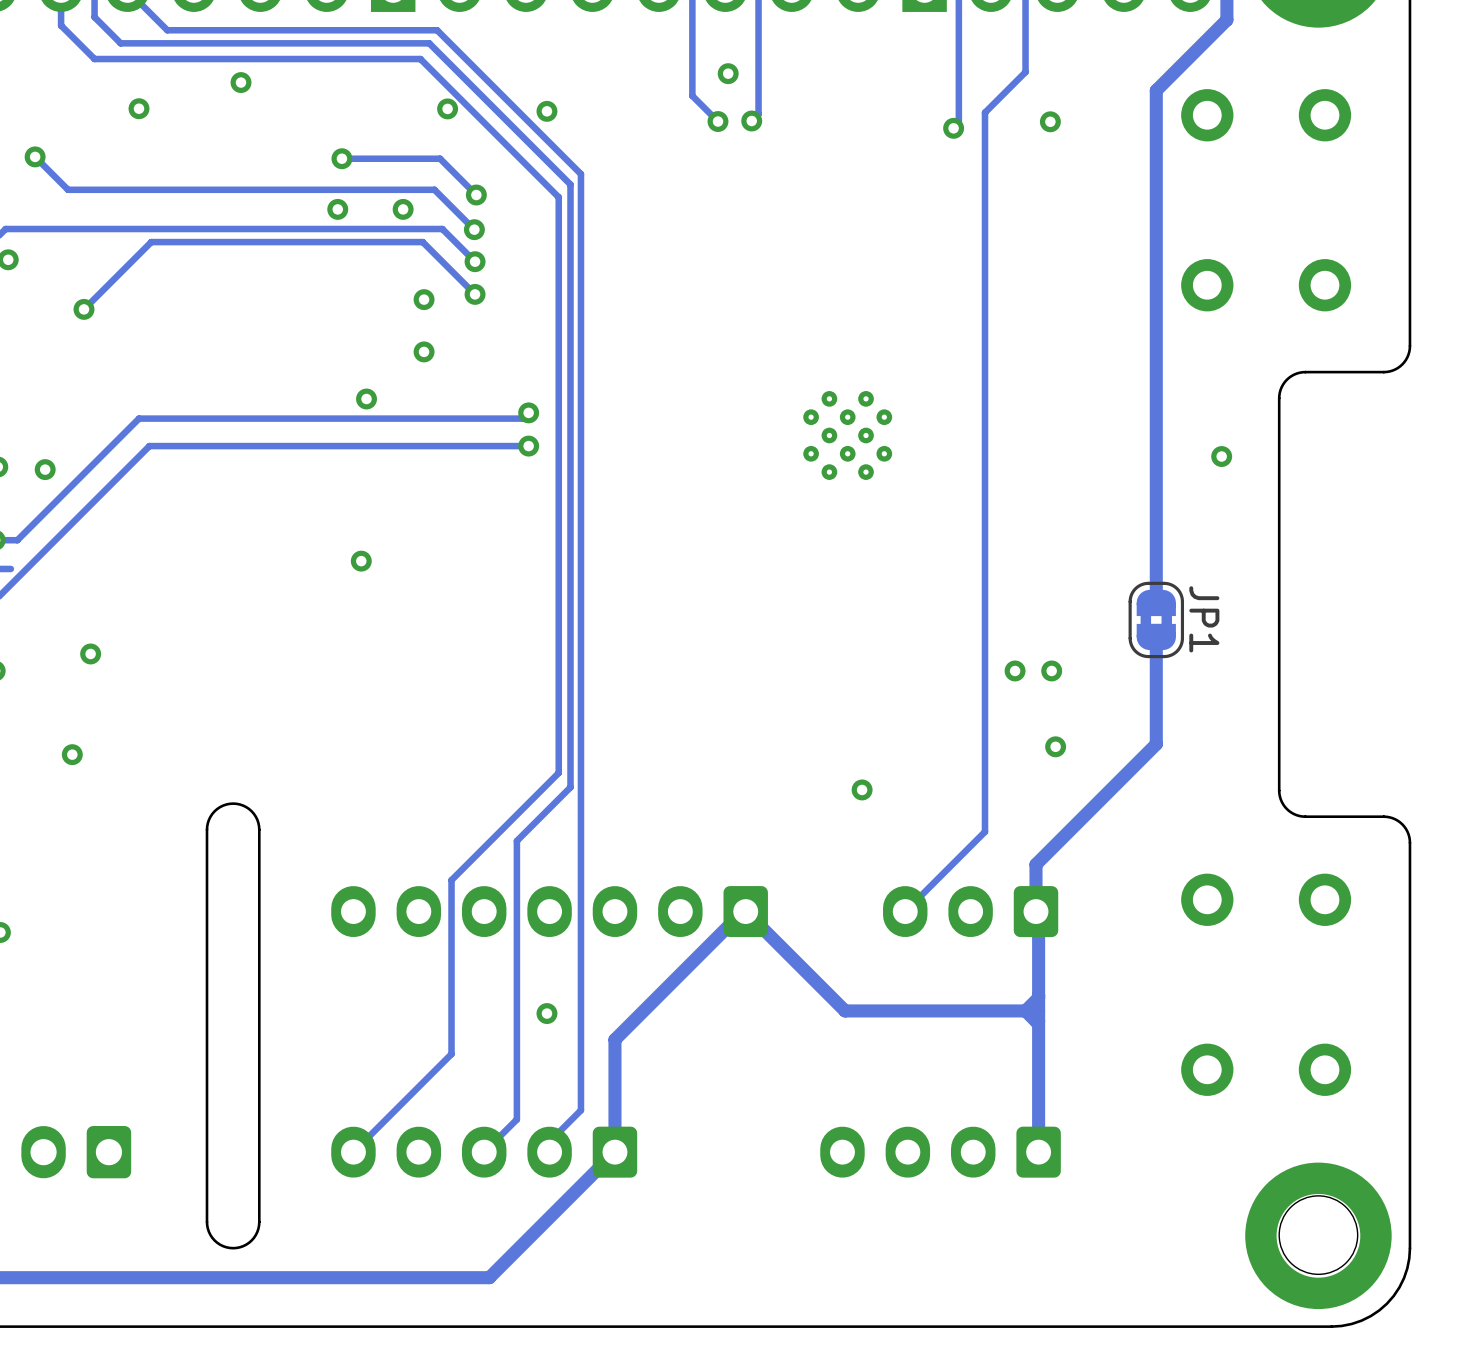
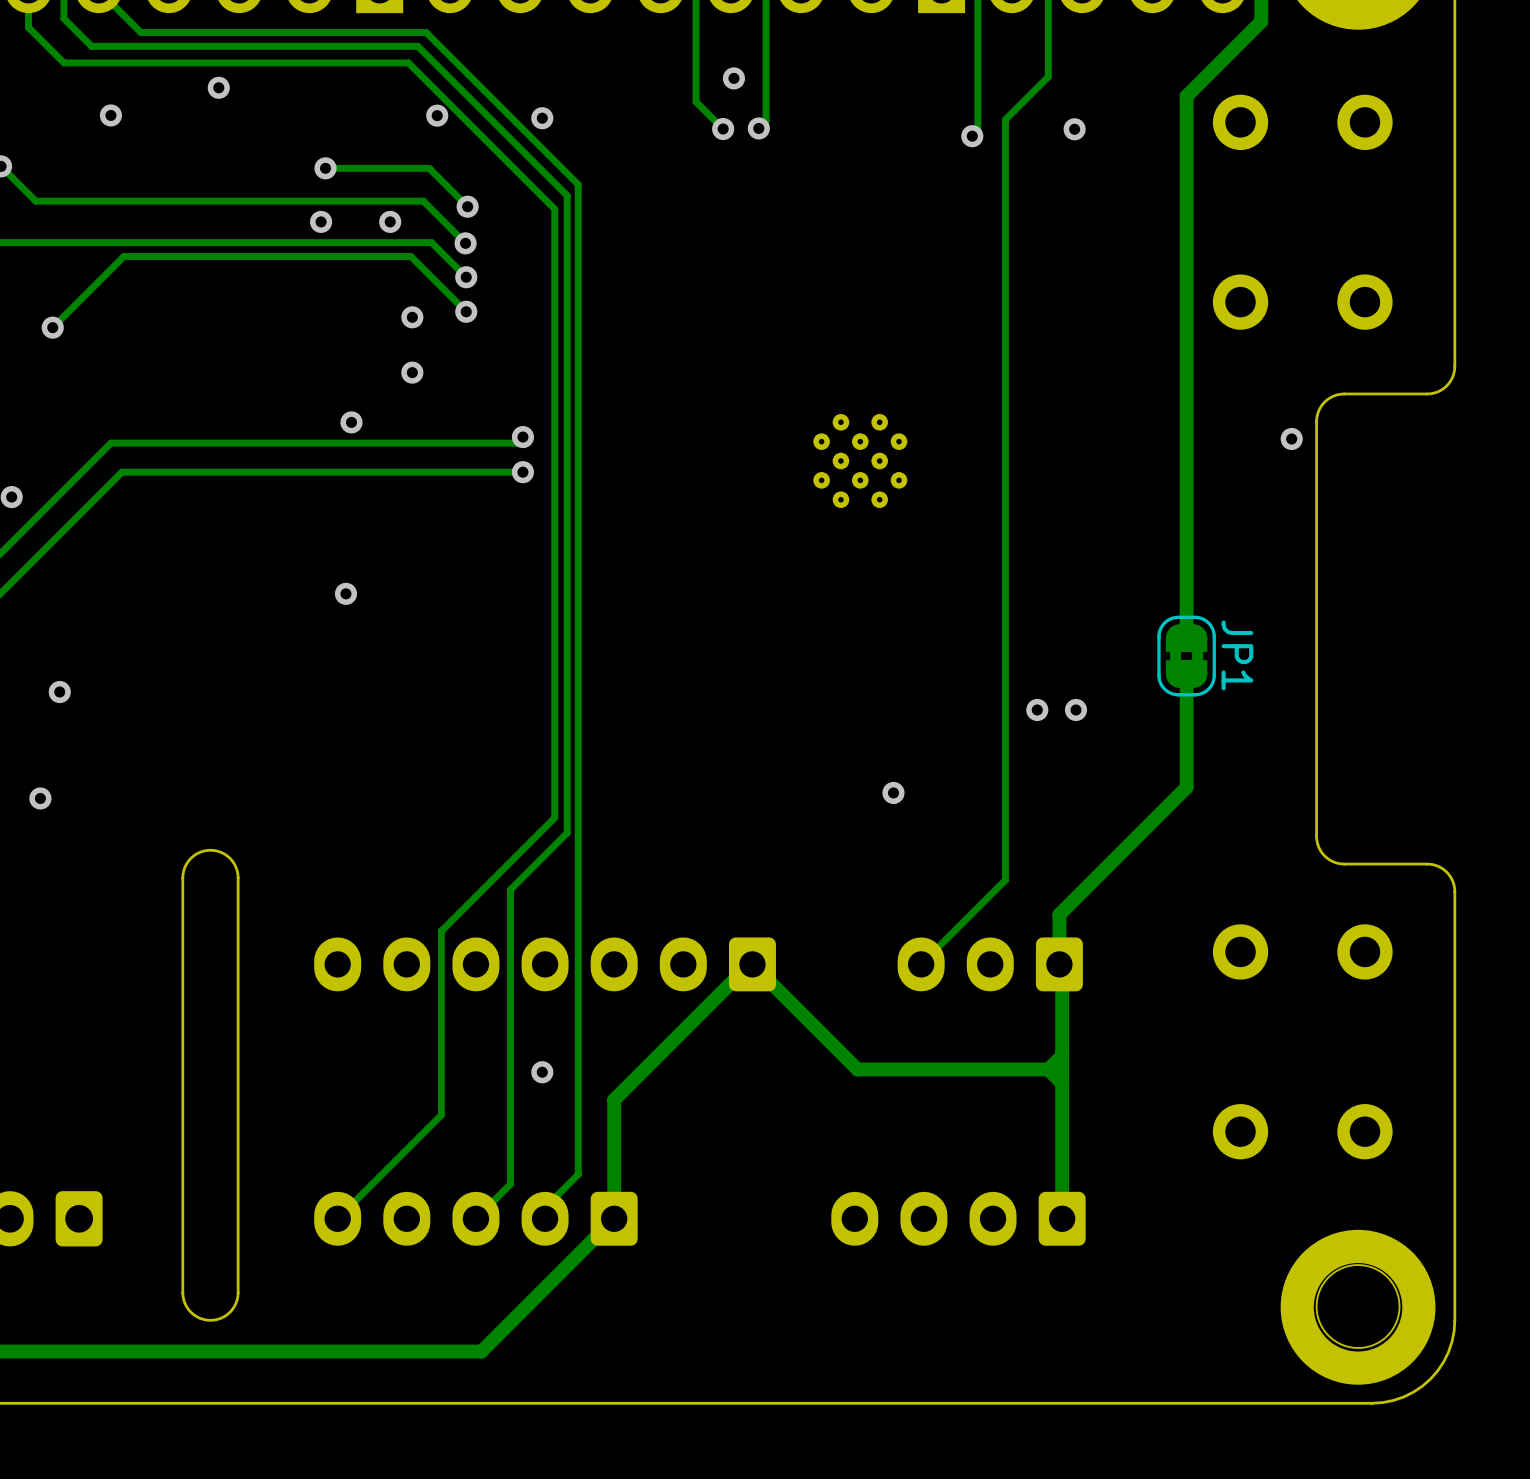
via position: (1221, 456) -> (1291, 438)
via: (1055, 746) -> none
via position: (862, 789) -> (893, 792)

